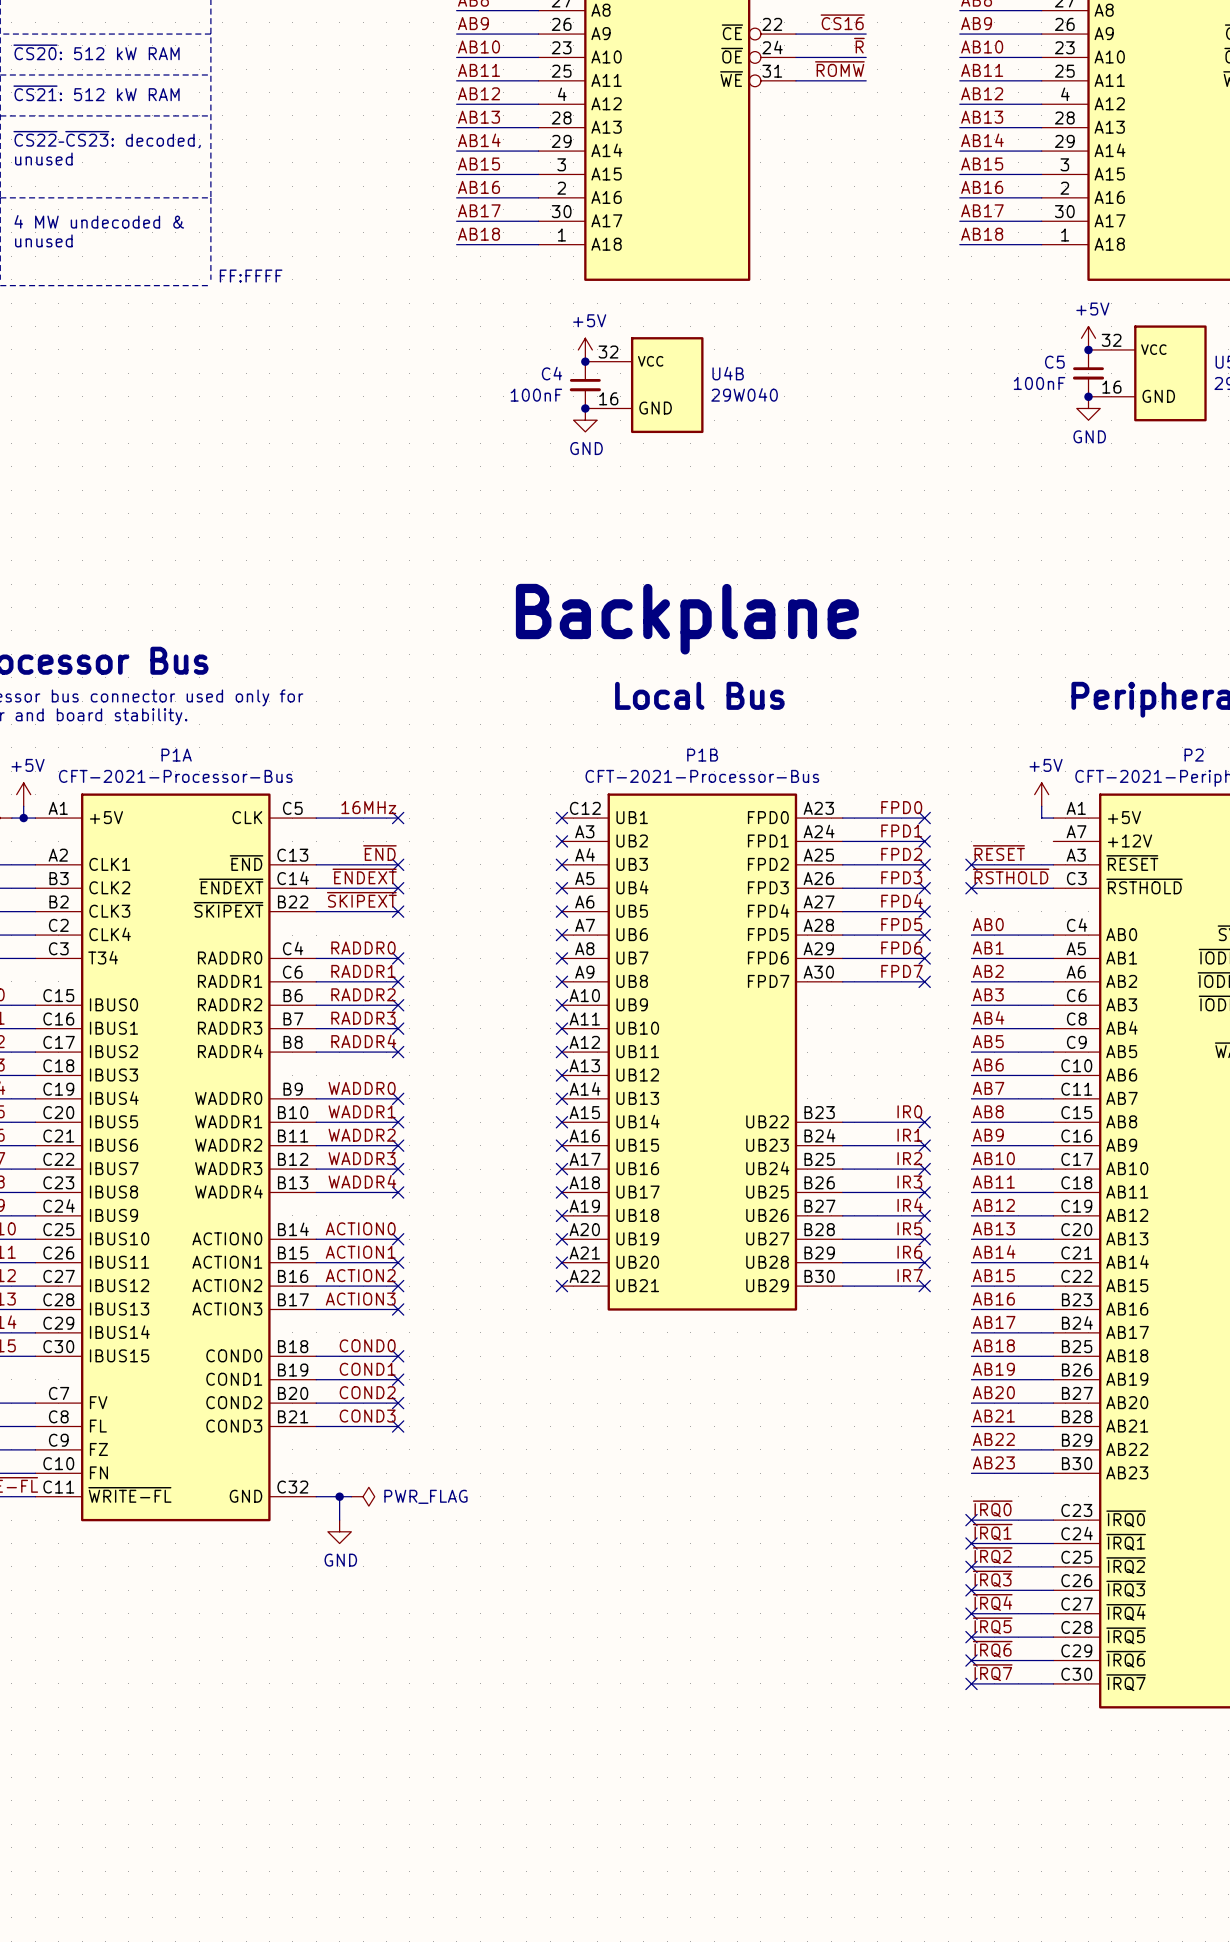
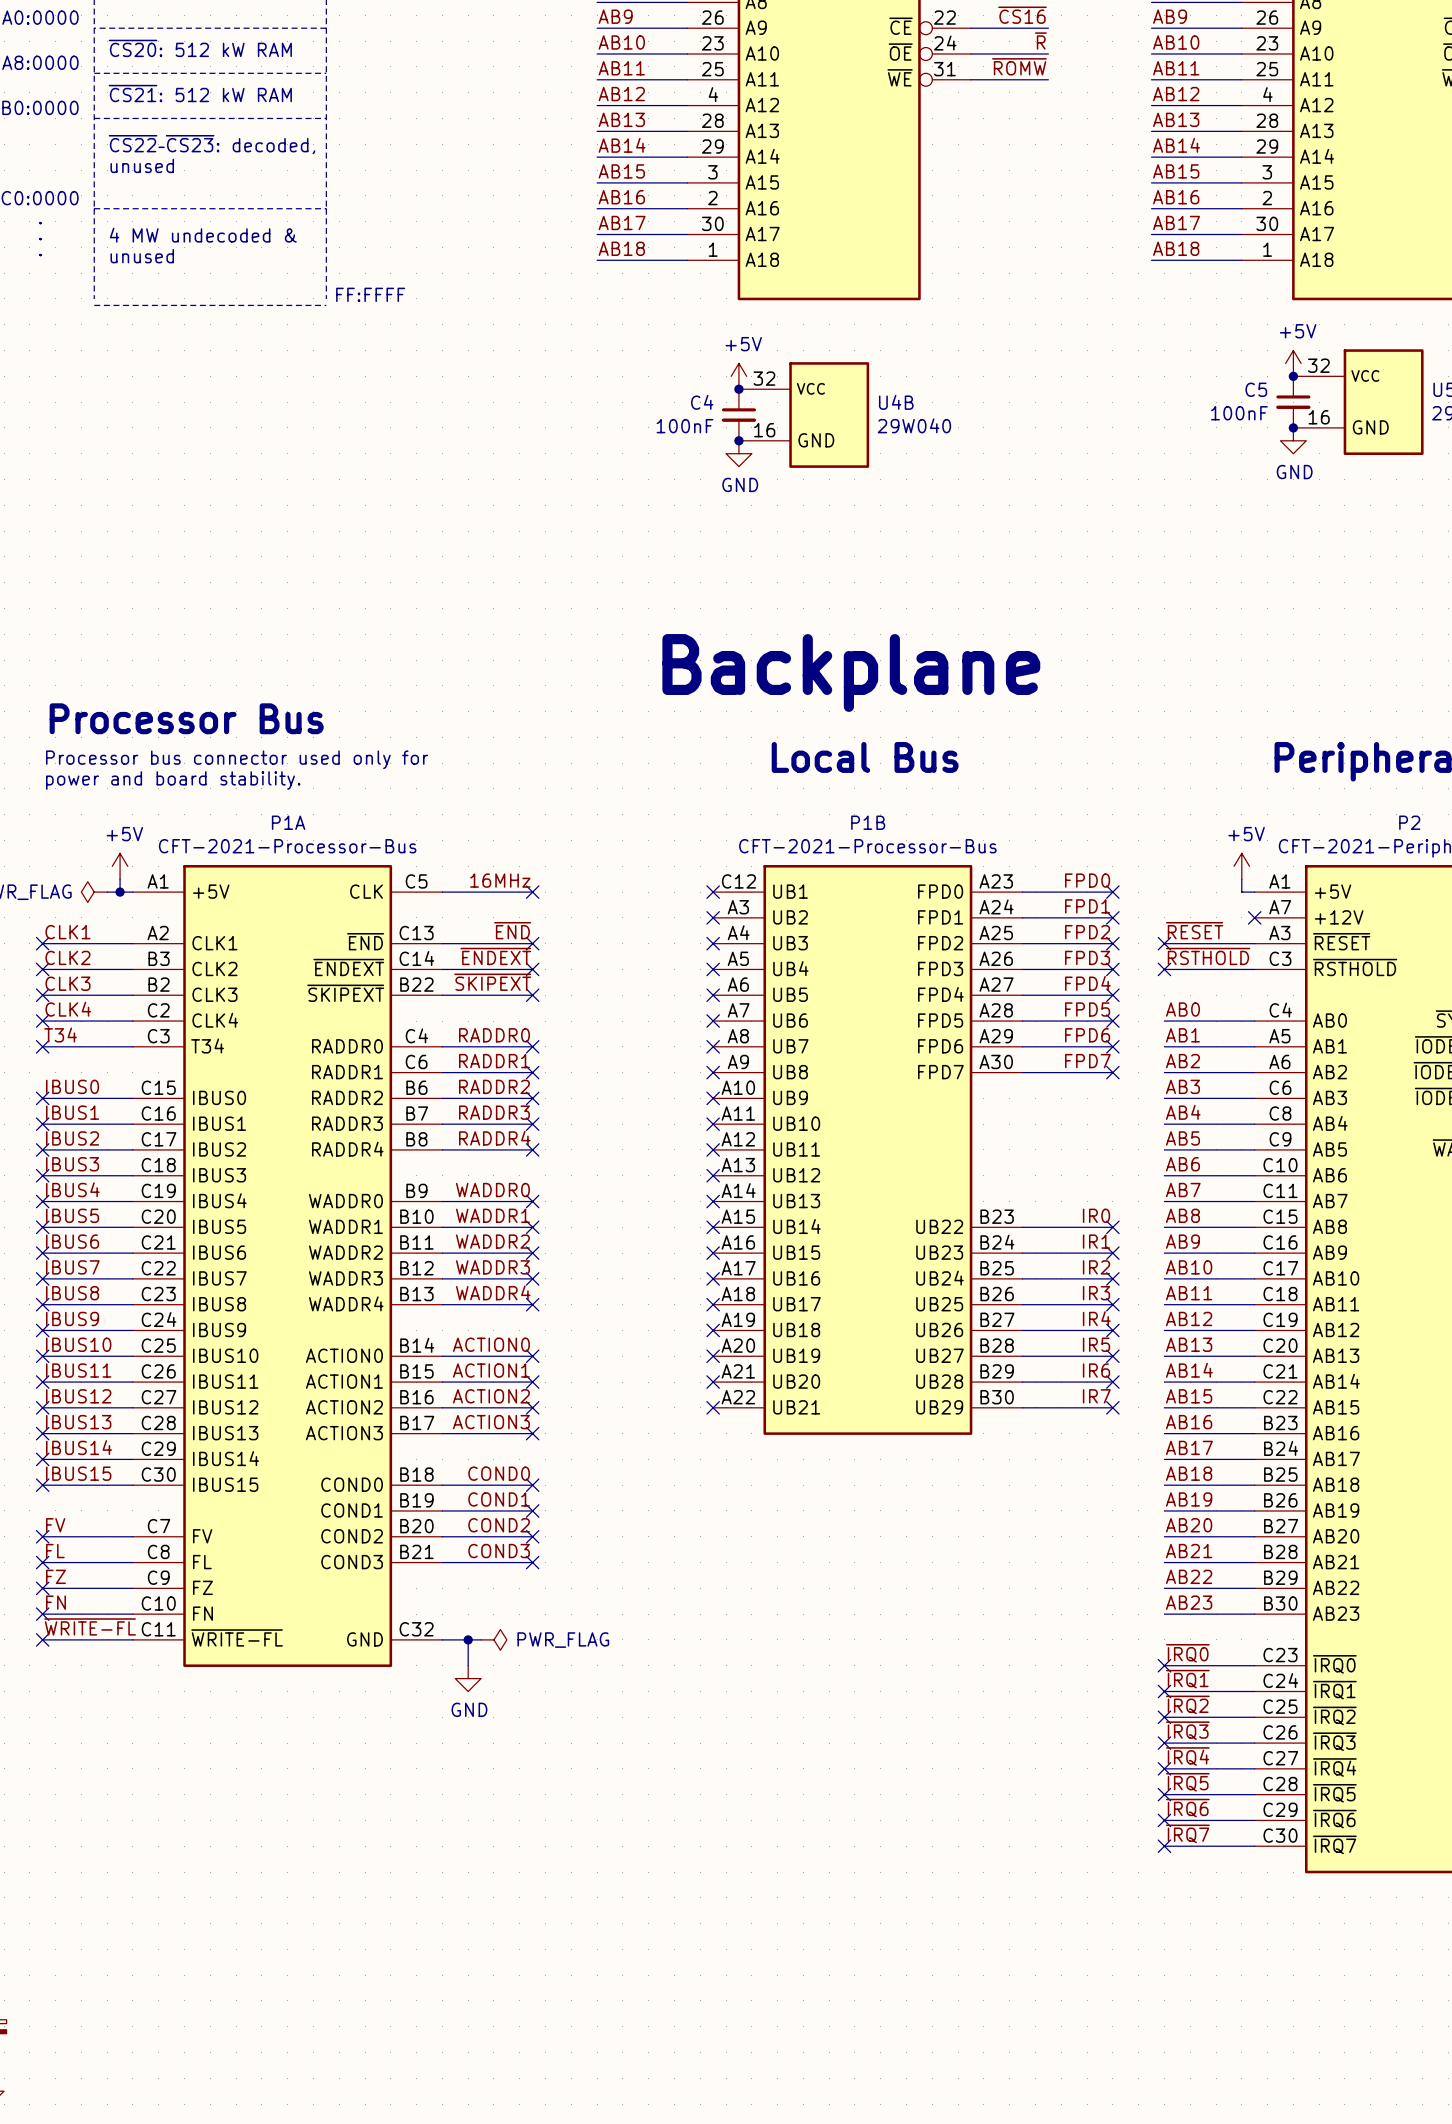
no-connect mark: none -> (1254, 917)

